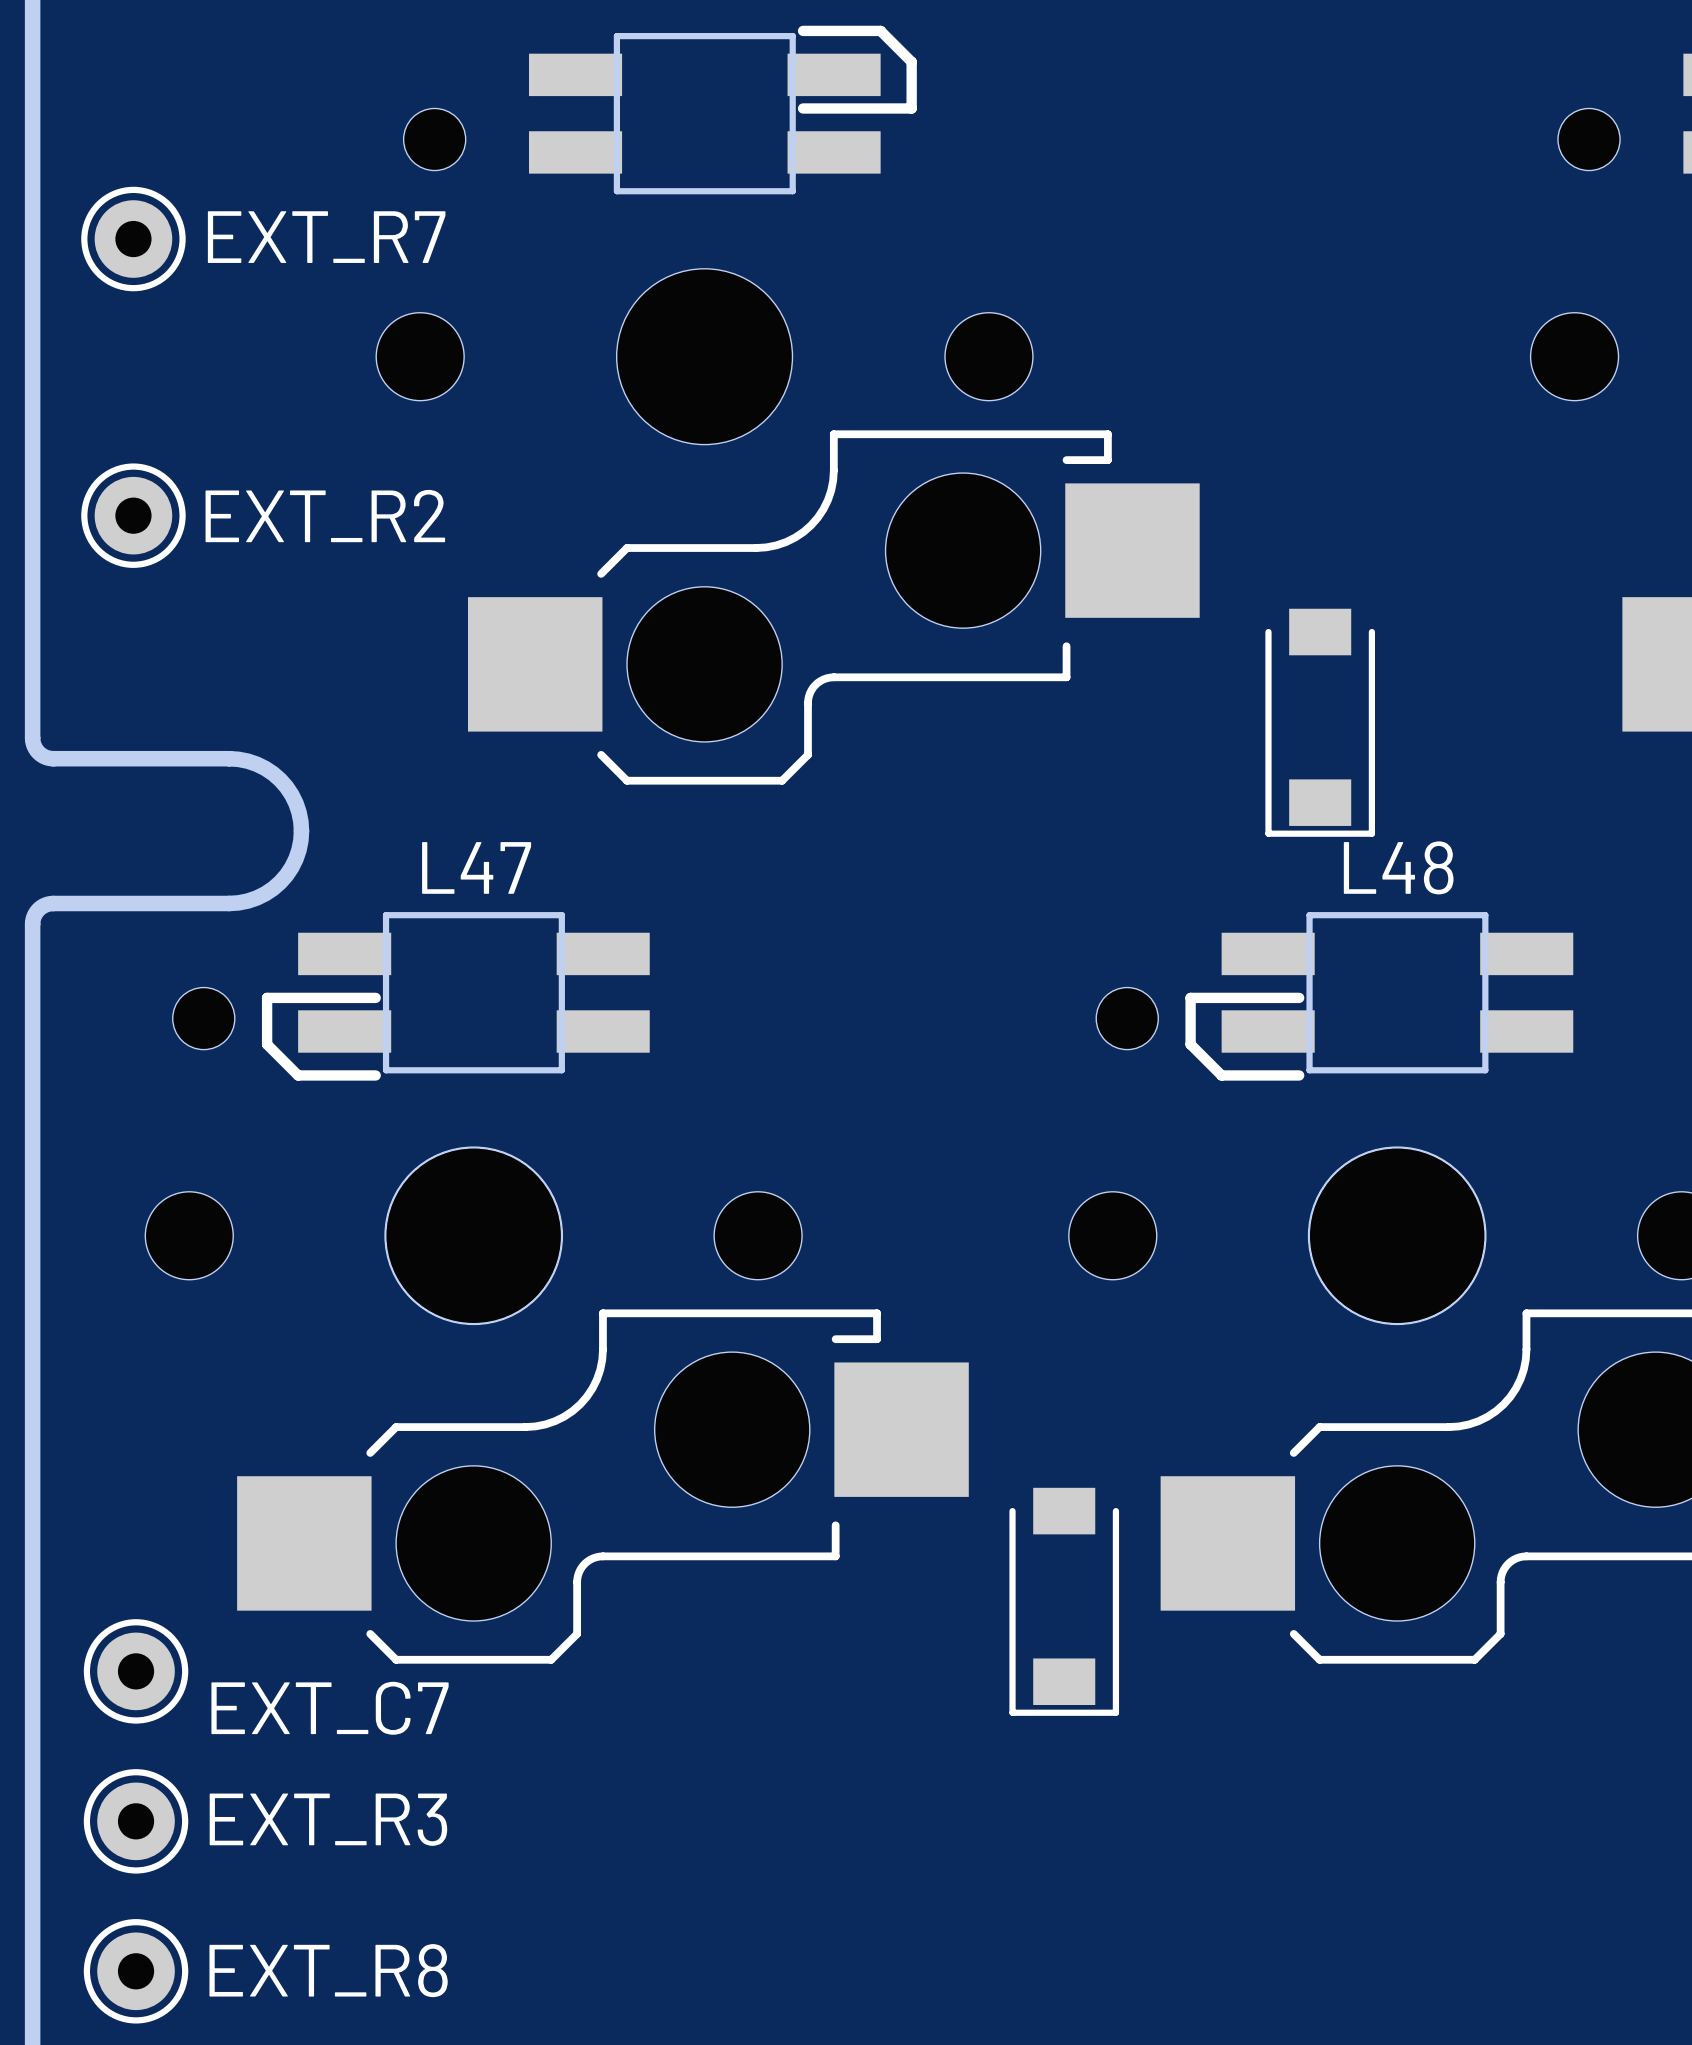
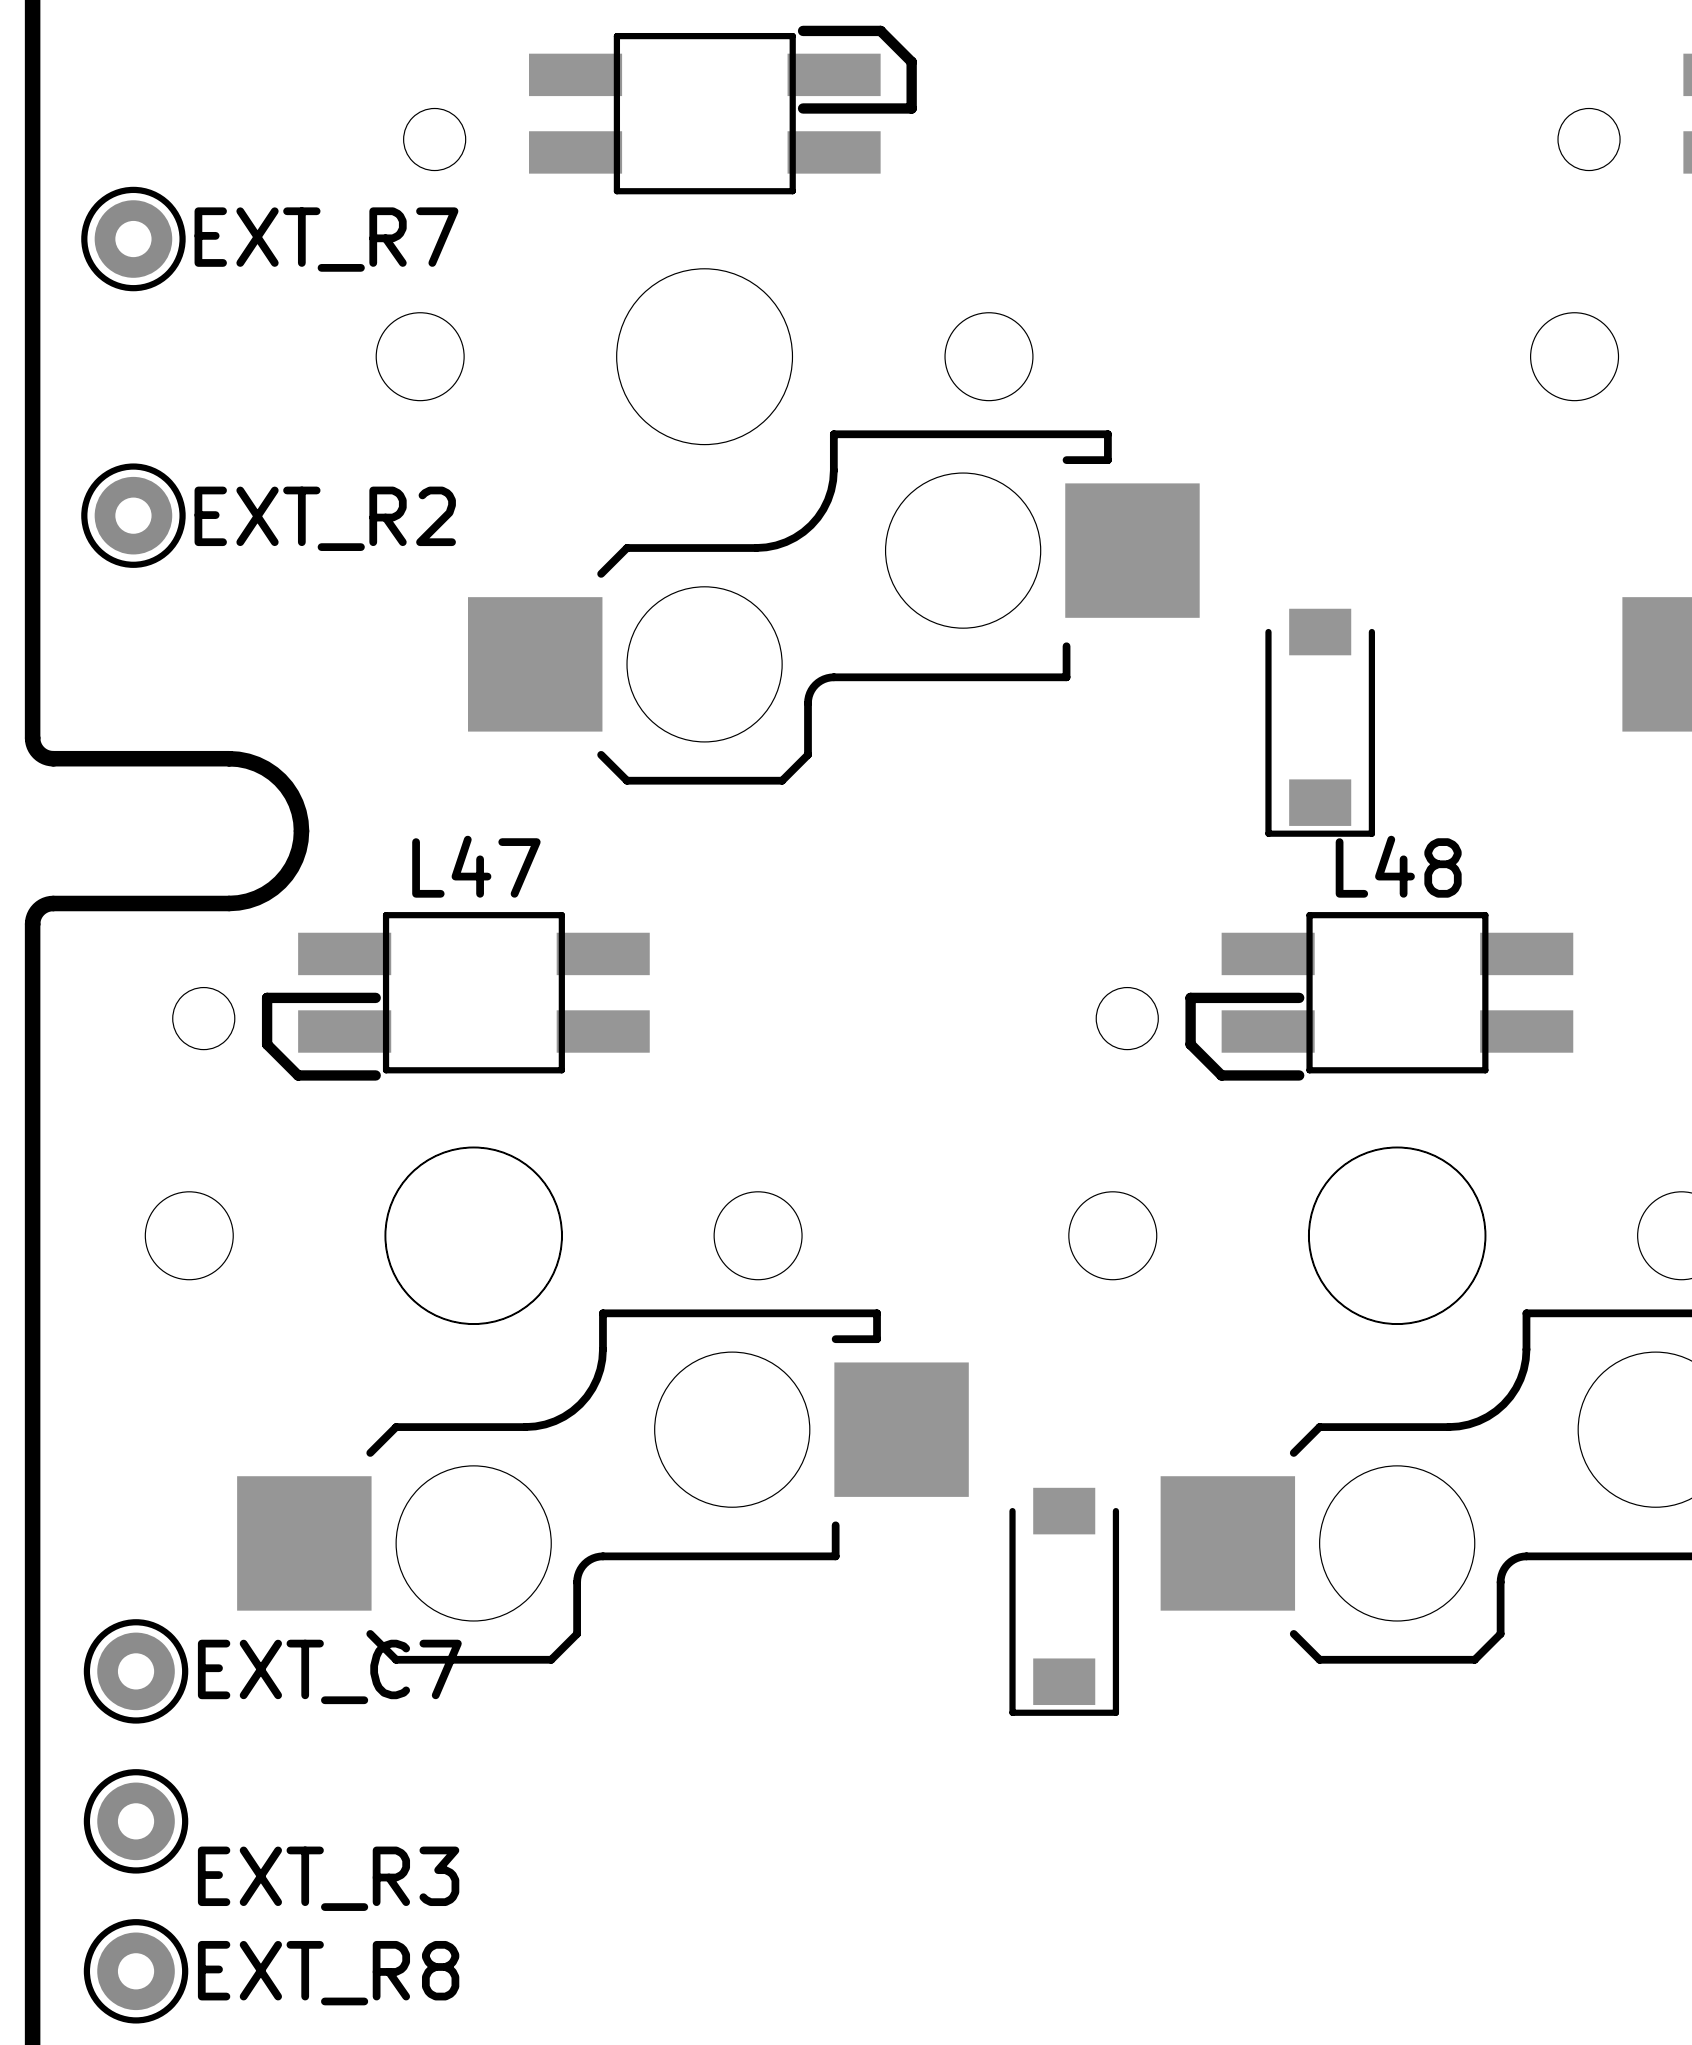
EXT_C7 name position: EXT_C7 (330, 1708) -> EXT_C7 (329, 1671)
EXT_R3 name position: EXT_R3 (328, 1819) -> EXT_R3 (328, 1878)

